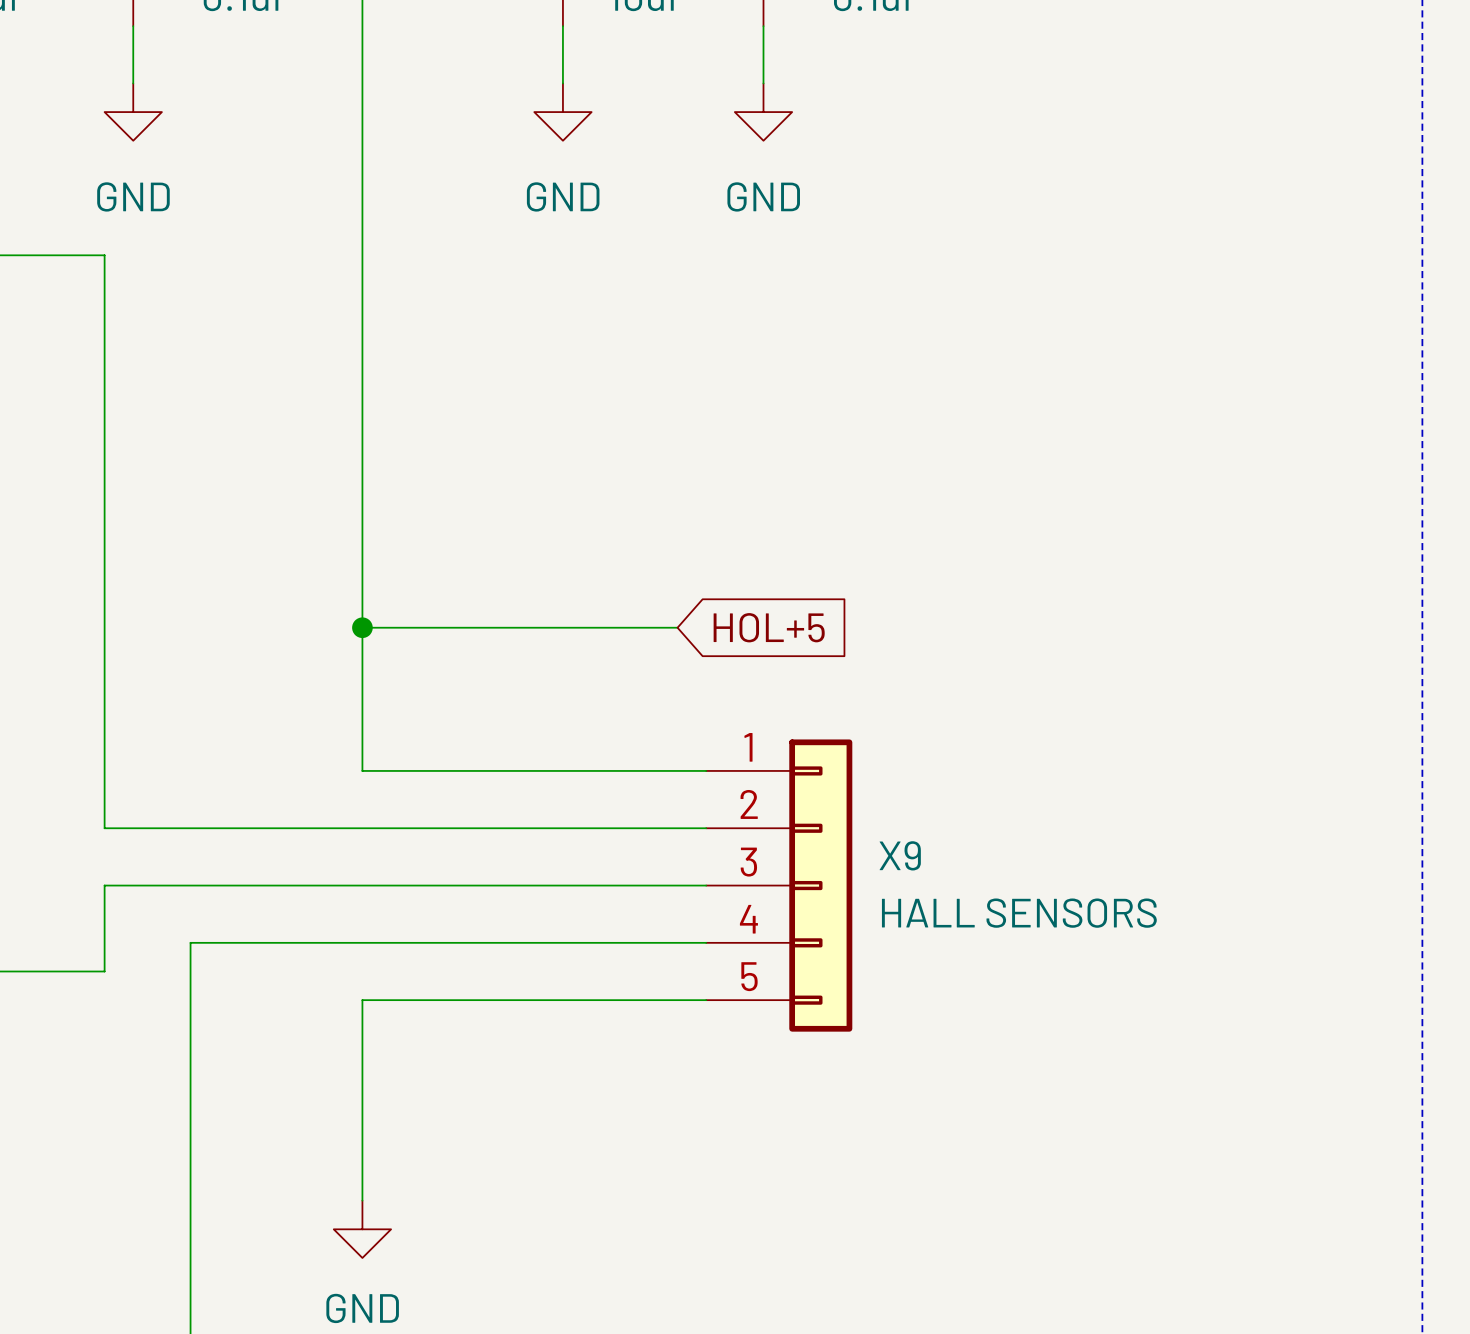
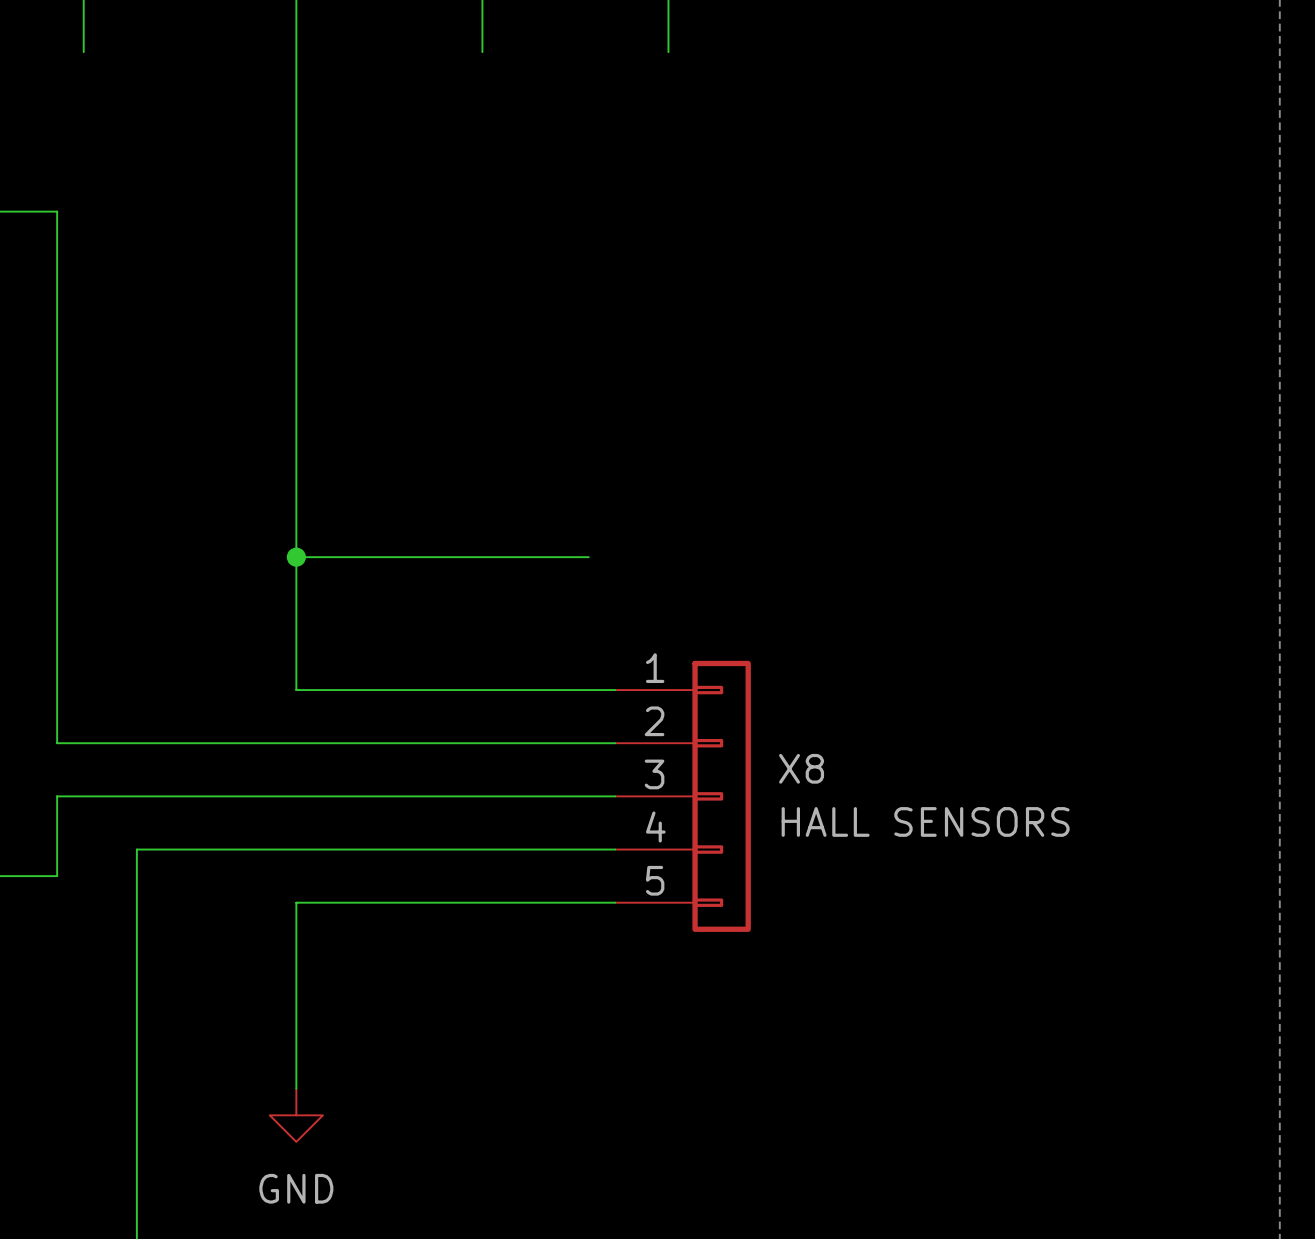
power symbol: GND (133, 112) -> none
power symbol: GND (562, 112) -> none
power symbol: GND (763, 112) -> none
global label: HOL+5 (769, 627) -> none
X9 name: X9 (900, 855) -> X8 (801, 768)

